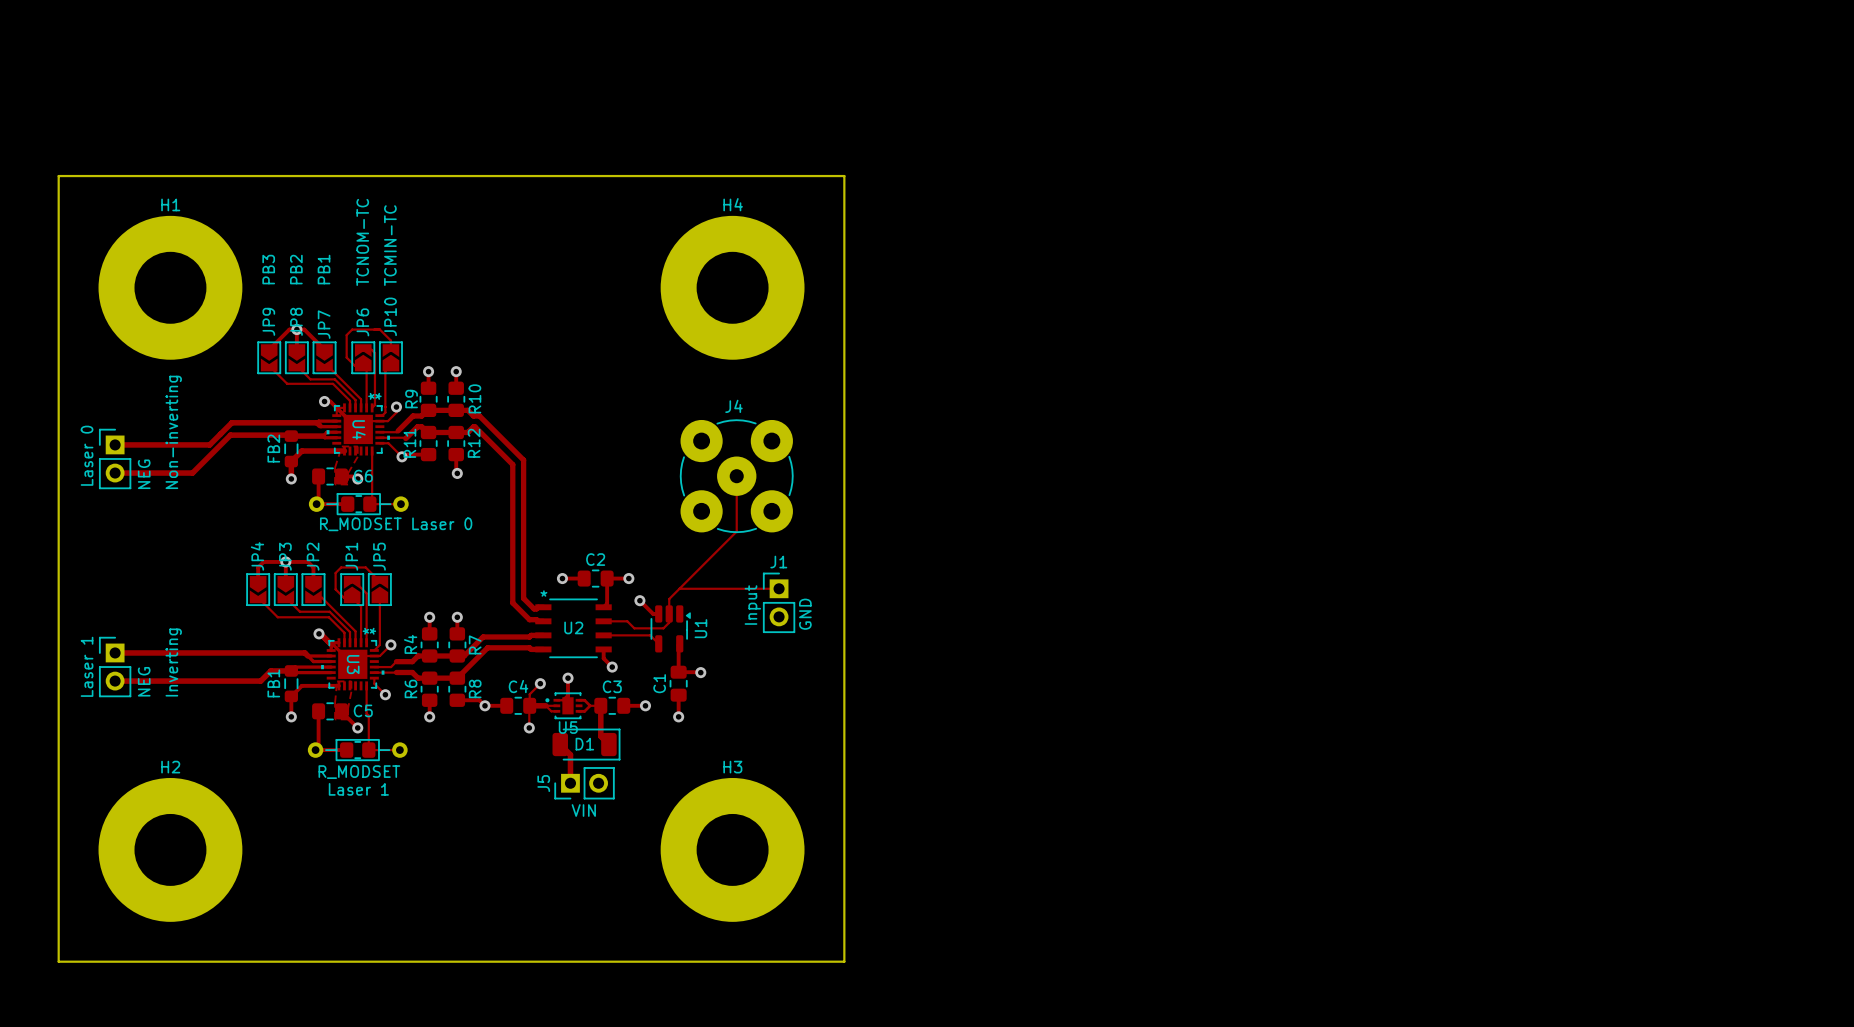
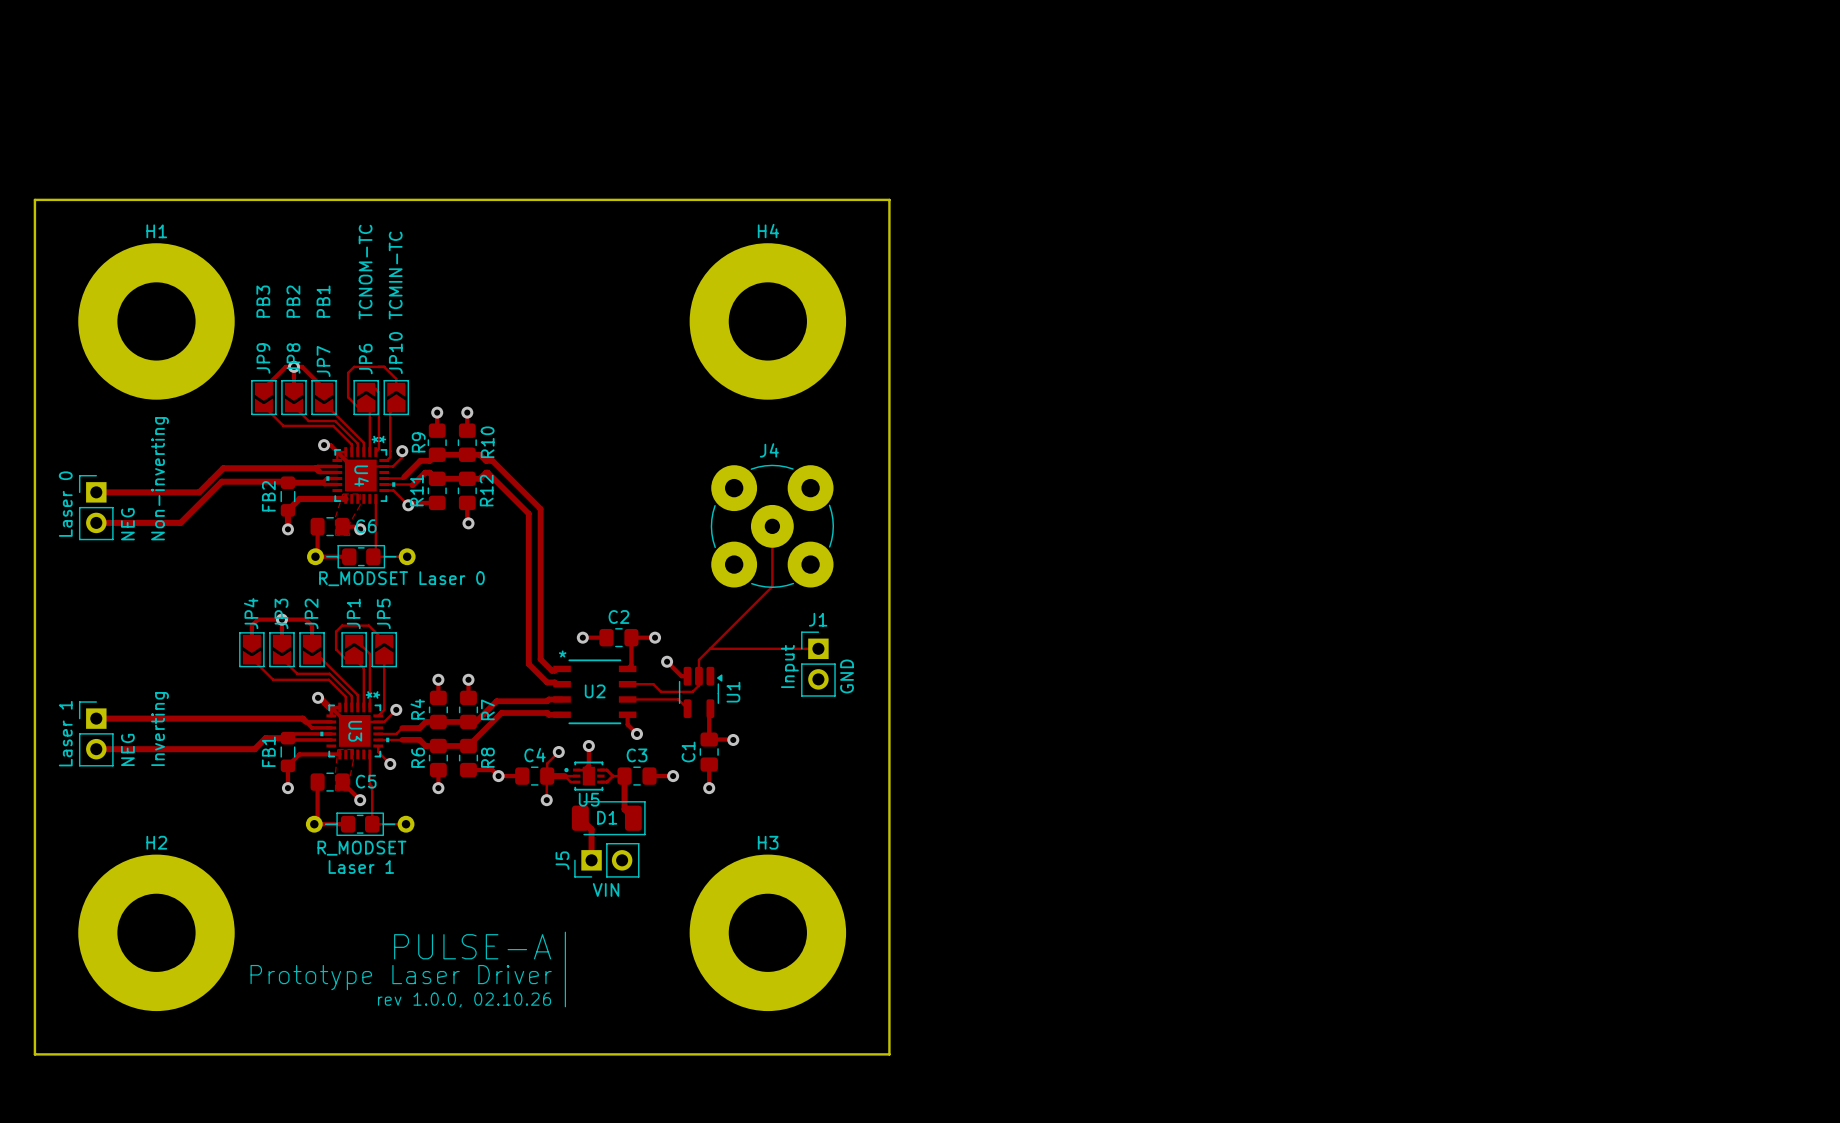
line: none -> (565, 932) (565, 1006)
text: none -> PULSE-A (472, 946)
text: none -> Prototype Laser Driver (401, 977)
text: none -> rev 1.0.0, 02.10.26 (464, 999)

